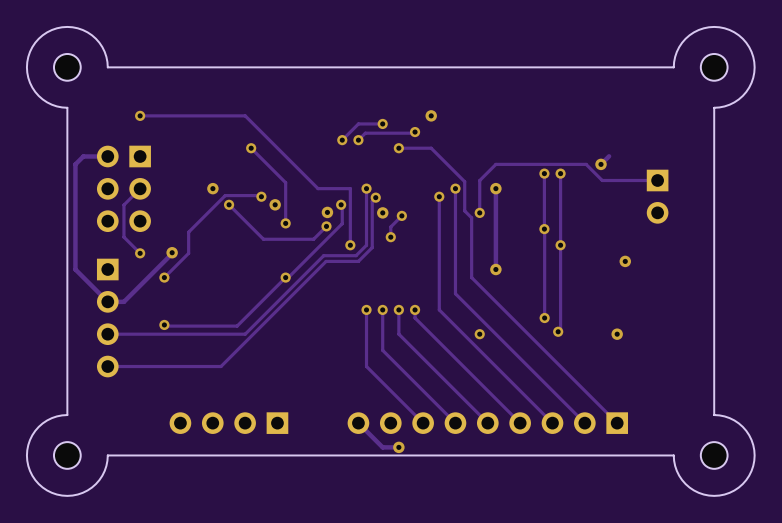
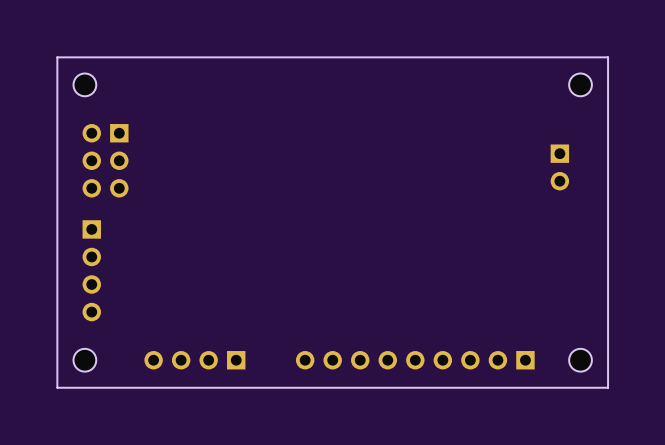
part position: (67, 67) -> (84, 84)
board edge: (107, 67) (102, 47) (95, 38) (82, 30) (62, 27) (51, 30) (38, 38) (32, 47) (27, 62) (30, 82) (35, 91) (47, 102) (67, 107) -> (91, 57) (57, 57) (57, 91)
board edge: (673, 67) (676, 51) (682, 42) (698, 30) (719, 27) (729, 30) (742, 38) (751, 51) (754, 62) (751, 82) (738, 99) (729, 104) (714, 107) -> (573, 57) (608, 57) (608, 91)
part position: (714, 67) -> (580, 84)
track: (140, 115) (245, 115) (318, 188) (350, 188) (350, 245) -> none
via: (140, 115) -> none
via: (431, 115) -> none
track: (382, 123) (358, 123) (342, 140) -> none
via: (382, 123) -> none
track: (415, 132) (365, 133) (358, 140) -> none
via: (415, 132) -> none
via: (342, 140) -> none
via: (358, 140) -> none
track: (251, 148) (285, 182) (285, 223) -> none
via: (251, 148) -> none
track: (398, 148) (431, 148) (464, 181) (464, 210) (471, 217) (471, 277) (617, 423) -> none
via: (398, 148) -> none
track: (107, 156) (83, 156) (75, 164) (75, 269) (107, 301) (123, 301) (172, 252) -> none
track: (609, 156) (601, 164) -> none
via: (601, 164) -> none
track: (544, 173) (544, 318) -> none
via: (544, 173) -> none
track: (560, 173) (560, 329) (558, 331) -> none
via: (560, 173) -> none
track: (657, 180) (602, 180) (586, 164) (495, 164) (479, 180) (479, 212) -> none
track: (140, 188) (123, 205) (123, 237) (140, 253) -> none
via: (212, 188) -> none
track: (366, 188) (366, 245) (356, 255) (323, 255) (245, 334) (107, 334) -> none
via: (366, 188) -> none
track: (455, 188) (455, 293) (584, 423) -> none
via: (455, 188) -> none
track: (495, 188) (495, 269) -> none
via: (495, 188) -> none
track: (261, 196) (225, 195) (188, 232) (188, 253) (164, 277) -> none
via: (261, 196) -> none
track: (439, 196) (439, 309) (552, 423) -> none
via: (439, 196) -> none
track: (375, 197) (372, 201) (372, 247) (358, 261) (326, 261) (220, 366) (107, 366) -> none
via: (375, 197) -> none
track: (229, 204) (263, 239) (313, 239) (326, 226) -> none
via: (229, 204) -> none
via: (275, 204) -> none
track: (341, 204) (342, 223) (237, 326) (164, 324) -> none
via: (341, 204) -> none
via: (327, 212) -> none
via: (382, 212) -> none
via: (479, 212) -> none
track: (401, 215) (390, 226) (390, 237) -> none
via: (401, 215) -> none
via: (285, 223) -> none
via: (326, 226) -> none
via: (544, 229) -> none
via: (390, 237) -> none
via: (350, 245) -> none
via: (560, 245) -> none
via: (172, 252) -> none
via: (140, 253) -> none
via: (625, 261) -> none
via: (495, 269) -> none
via: (164, 277) -> none
via: (285, 277) -> none
track: (366, 309) (366, 366) (423, 423) -> none
via: (366, 309) -> none
track: (382, 309) (382, 350) (455, 423) -> none
via: (382, 309) -> none
track: (398, 309) (398, 334) (487, 423) -> none
via: (398, 309) -> none
track: (415, 309) (415, 318) (520, 423) -> none
via: (415, 309) -> none
via: (544, 318) -> none
via: (164, 324) -> none
via: (558, 331) -> none
via: (479, 334) -> none
via: (617, 334) -> none
board edge: (67, 415) (47, 420) (35, 430) (30, 440) (27, 450) (28, 465) (38, 484) (47, 490) (62, 495) (82, 492) (91, 487) (102, 475) (107, 455) -> (57, 353) (57, 387) (91, 387)
board edge: (714, 415) (734, 420) (742, 426) (751, 440) (754, 460) (749, 475) (742, 484) (724, 494) (714, 495) (698, 492) (685, 484) (679, 475) (673, 455) -> (608, 353) (608, 387) (573, 387)
track: (358, 423) (382, 447) (398, 447) -> none
via: (398, 447) -> none
part position: (67, 455) -> (84, 360)
part position: (714, 455) -> (580, 360)

